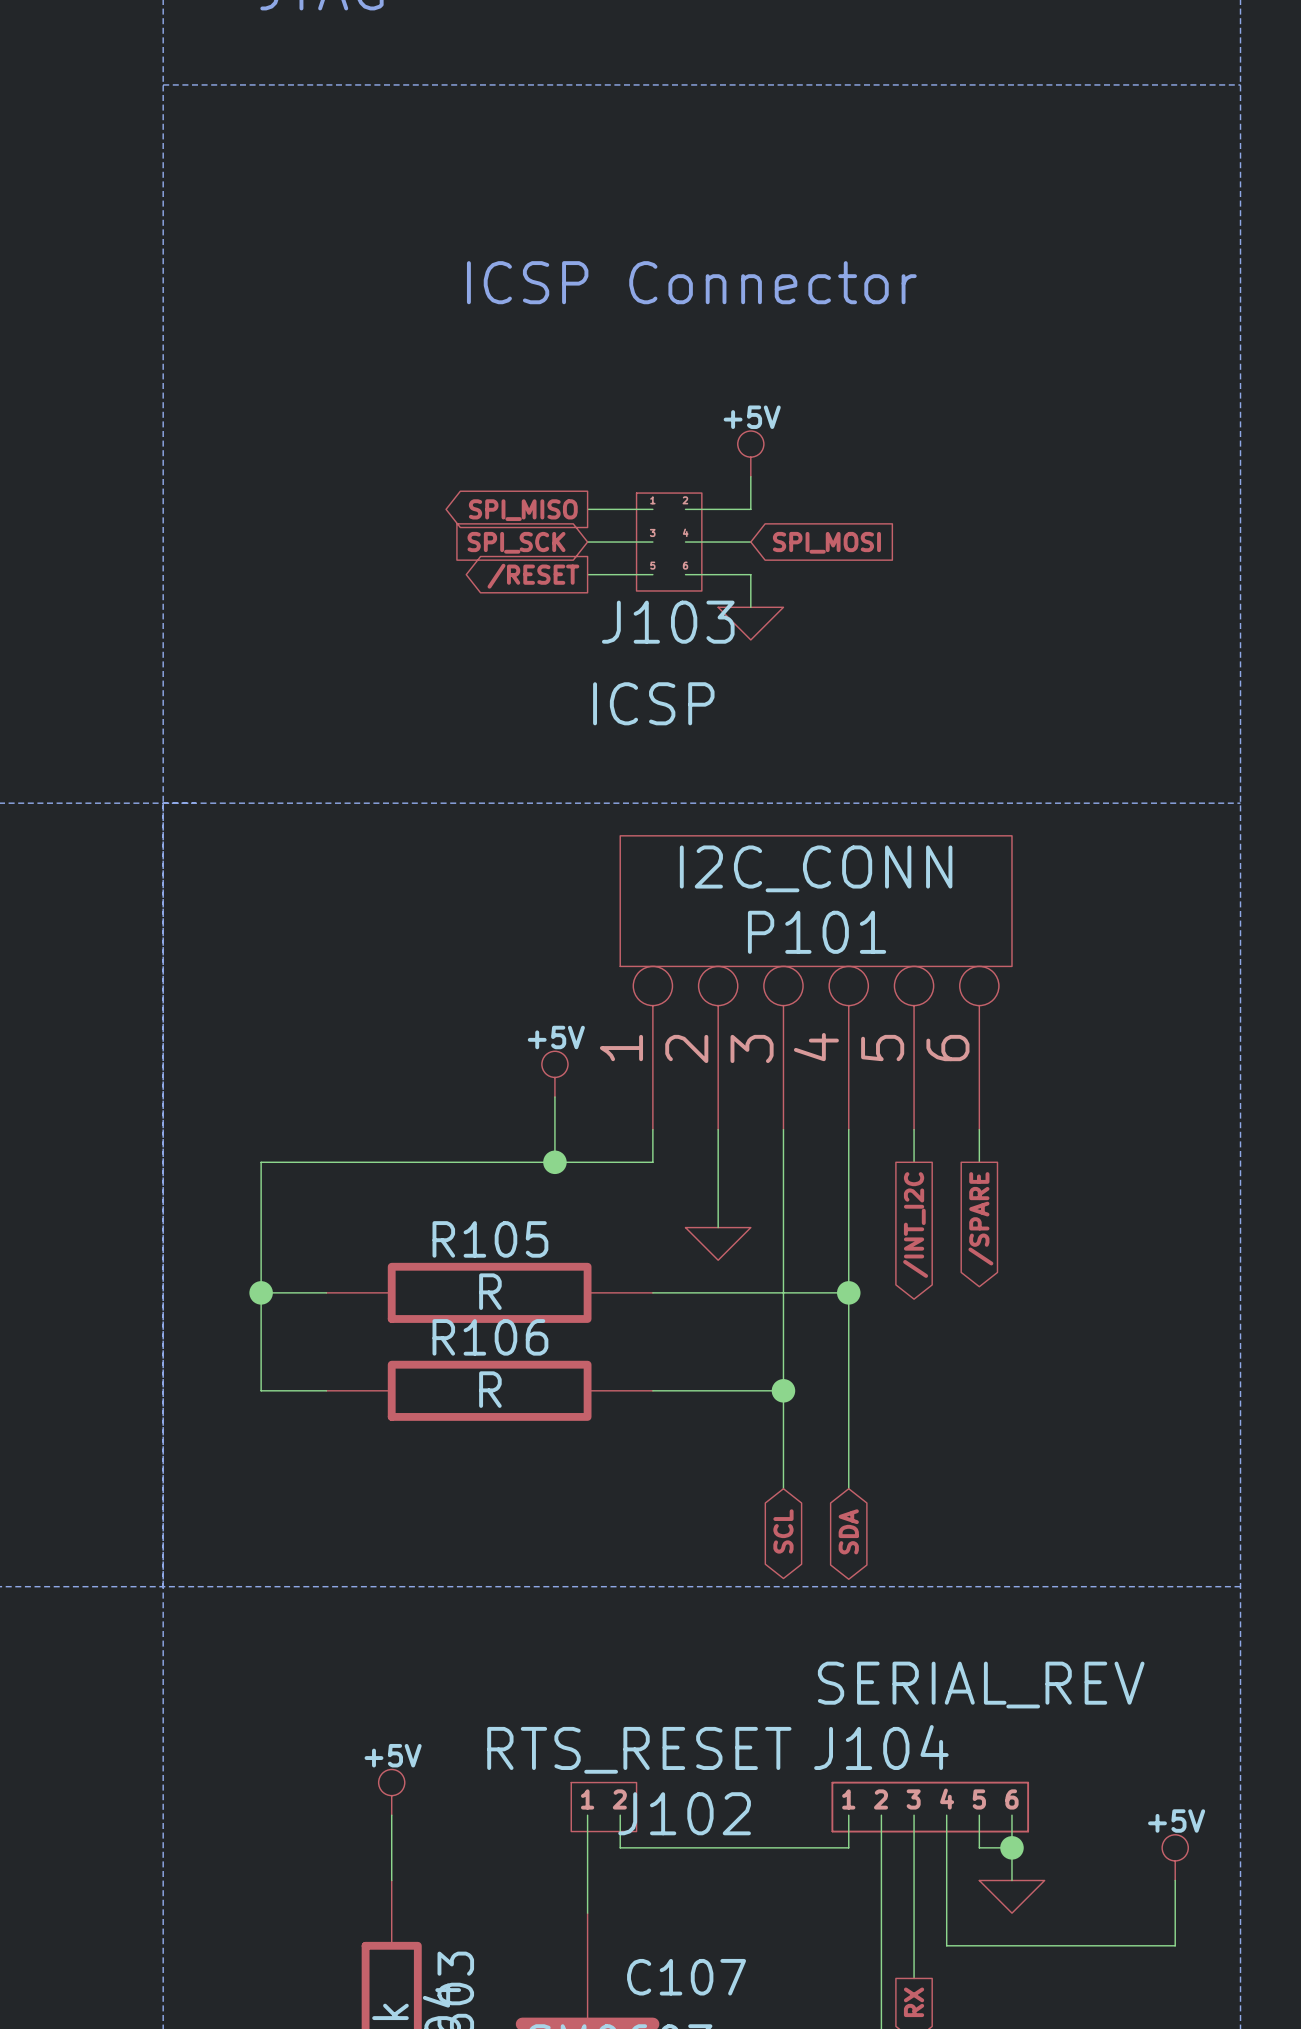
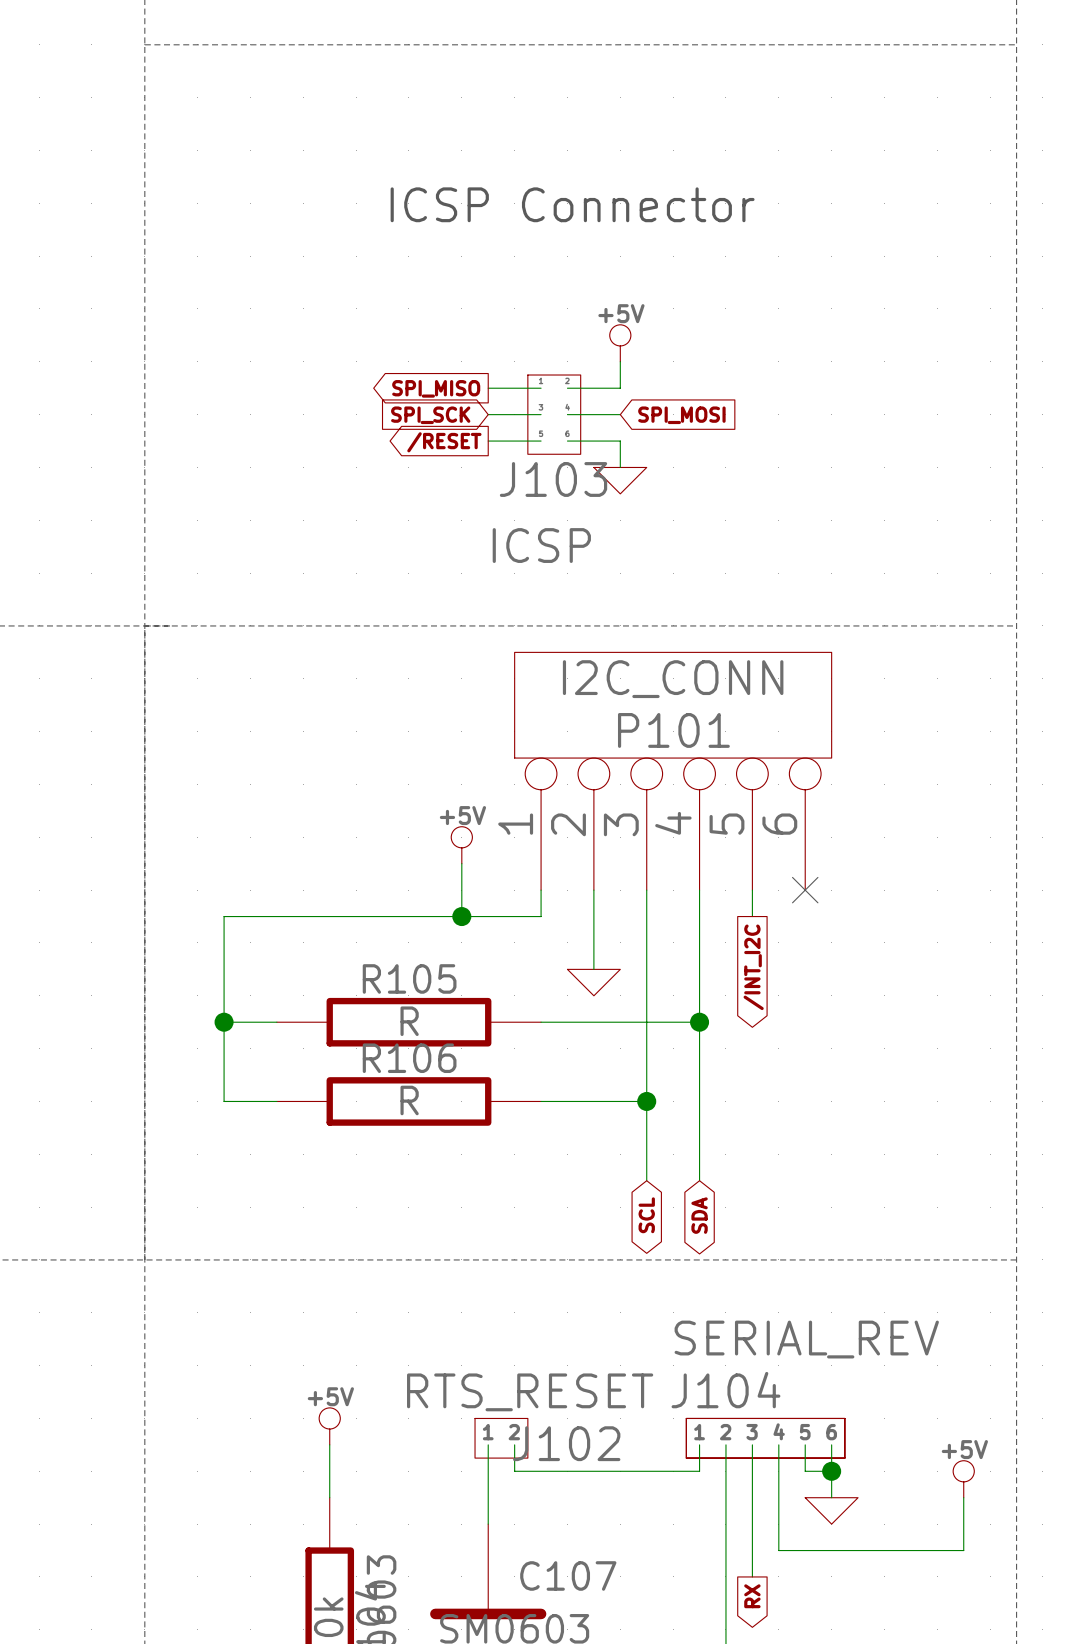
wire: (979, 1129) (979, 1162) -> none
no-connect mark: none -> (805, 890)
global label: /SPARE (980, 1218) -> none

